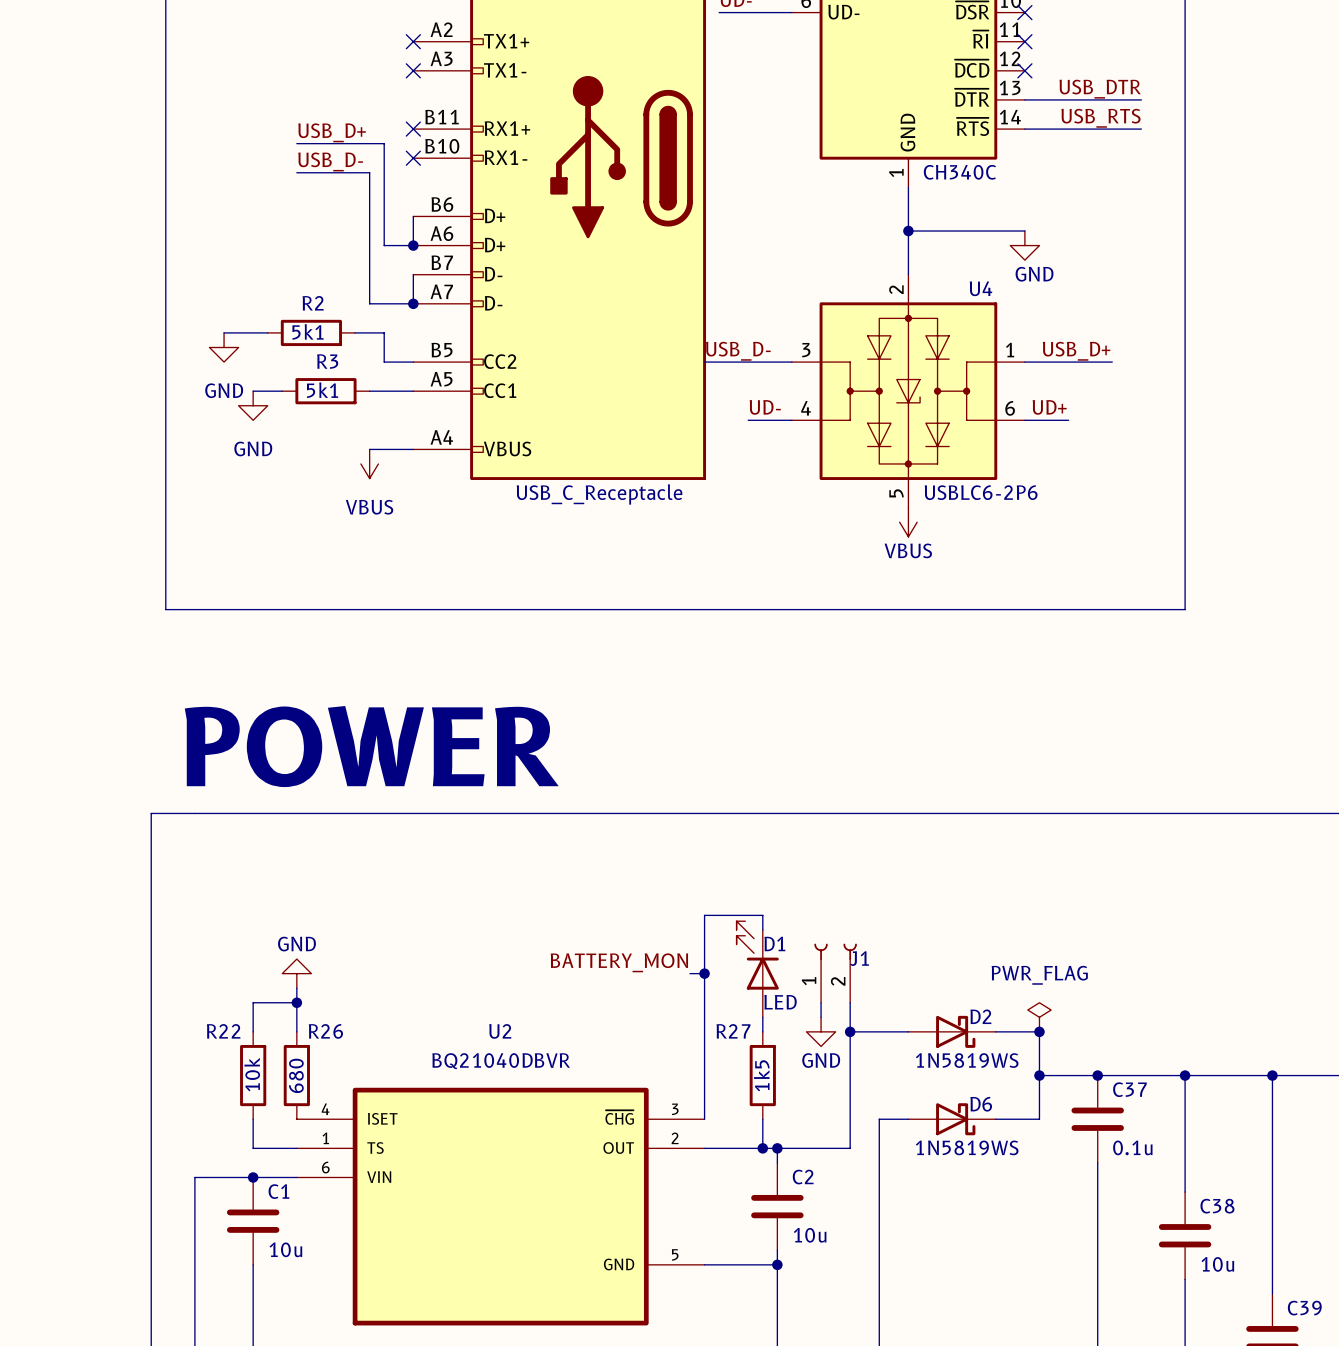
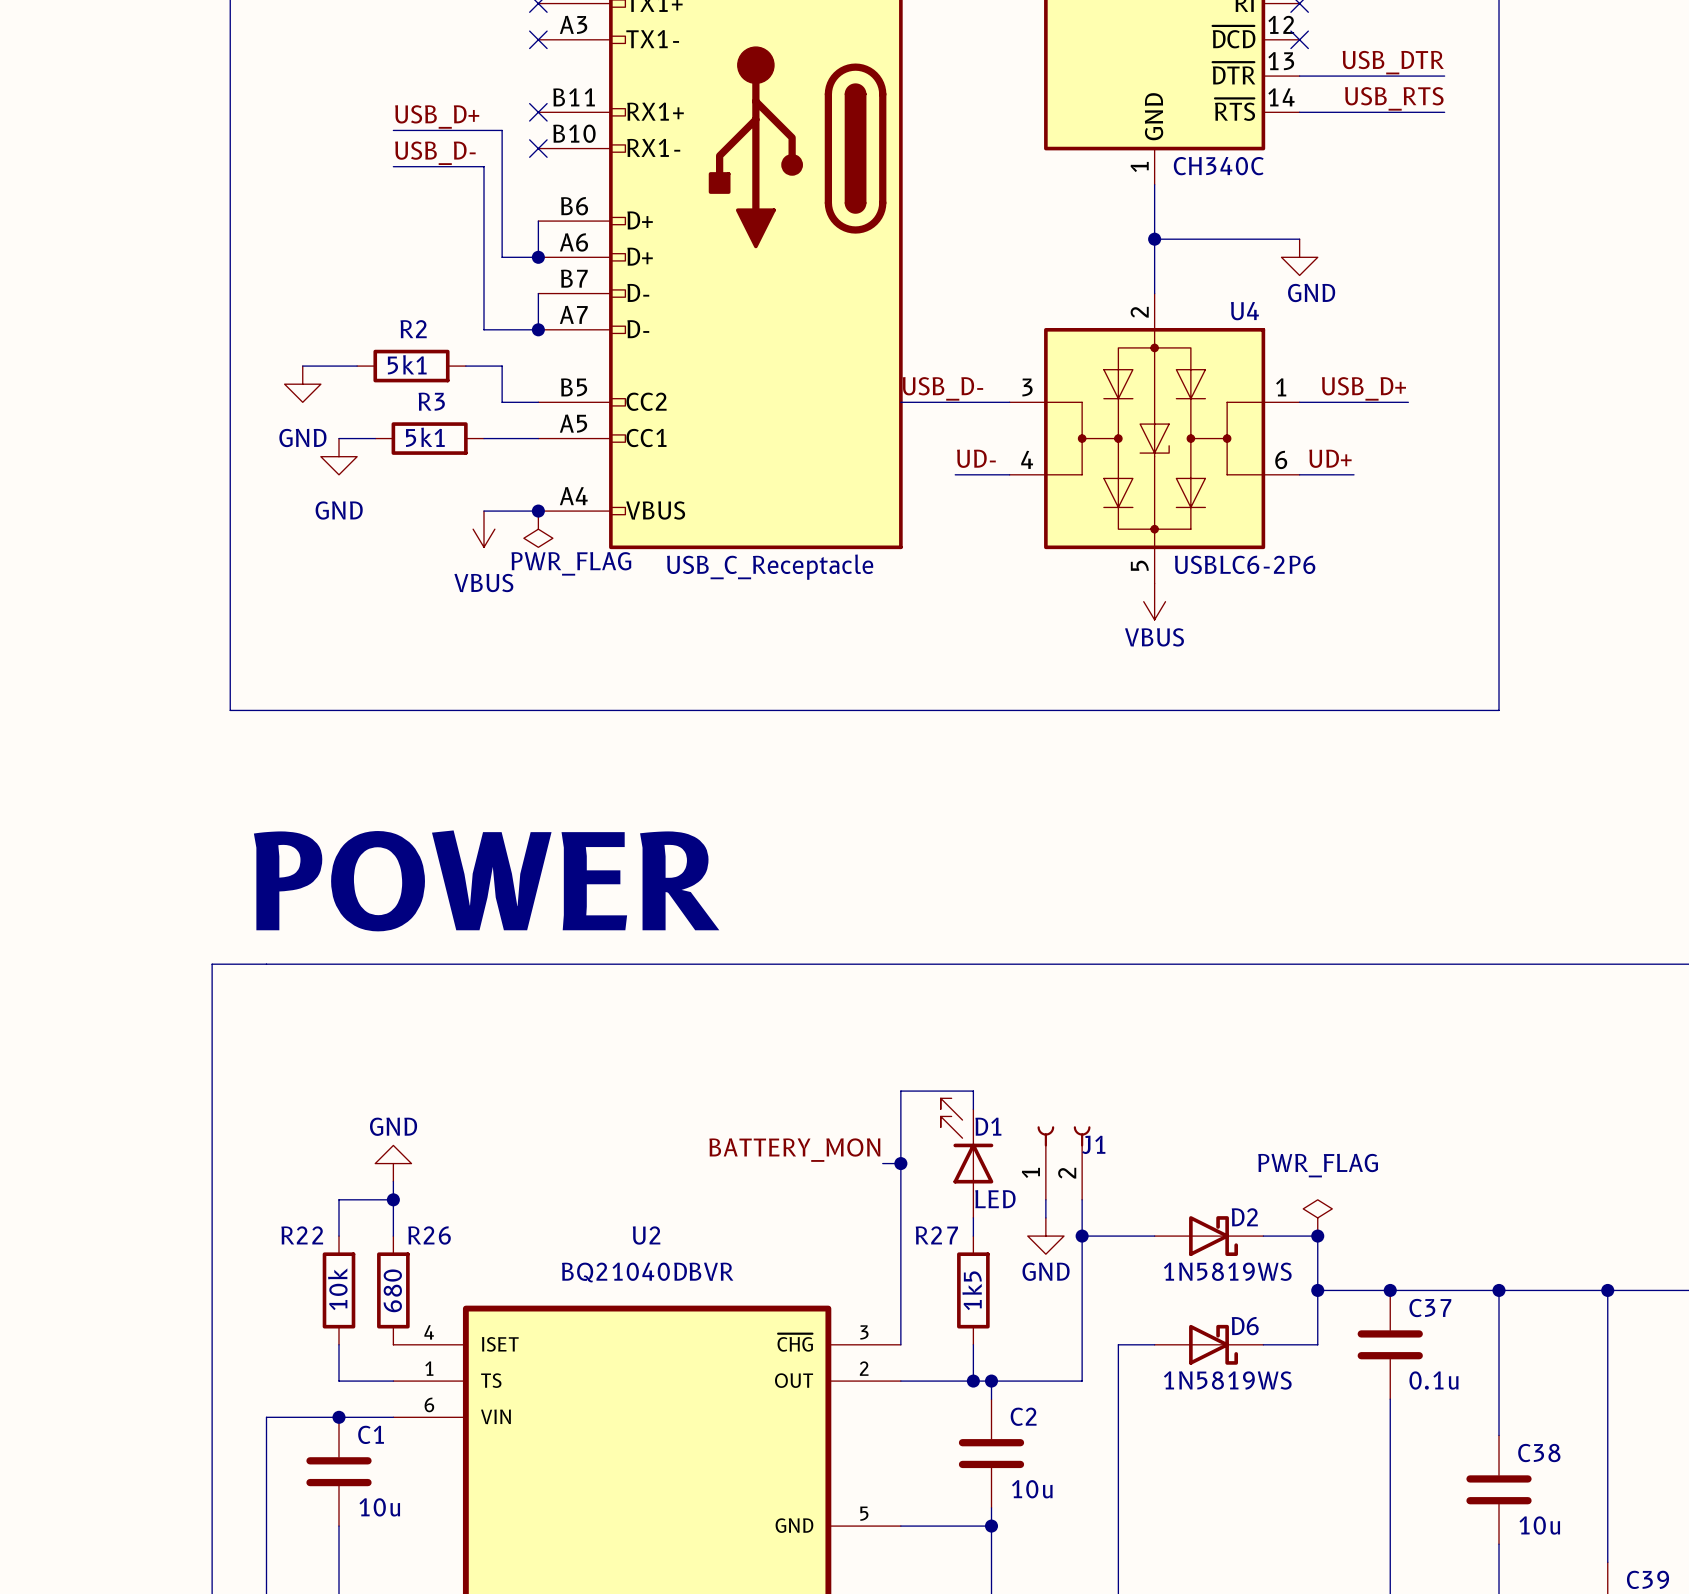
junction: none -> (538, 511)
power symbol: none -> PWR_FLAG (538, 529)

